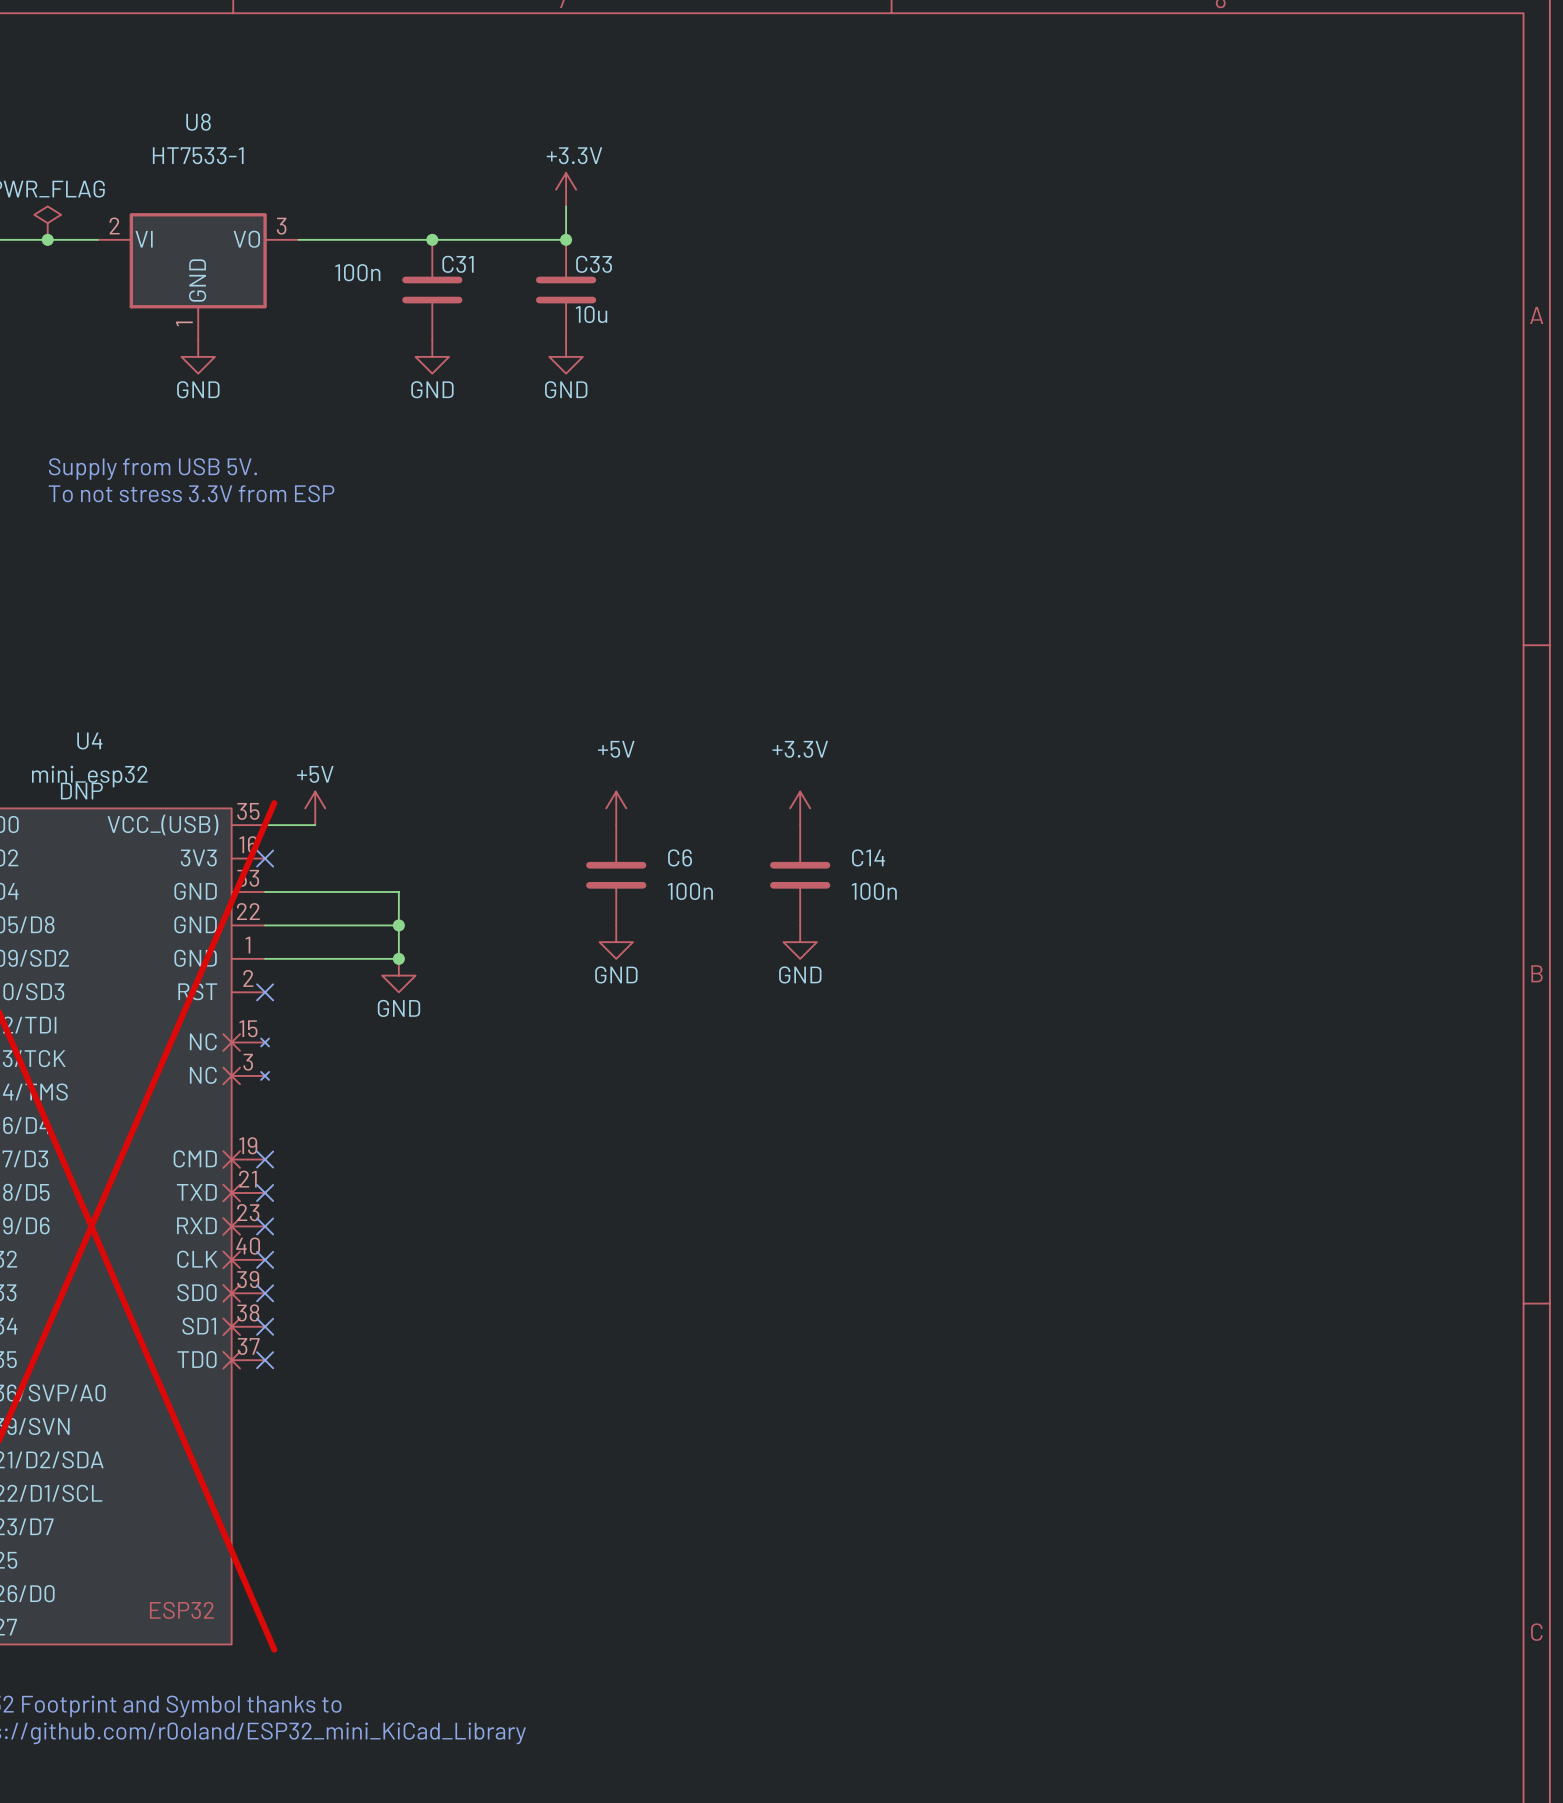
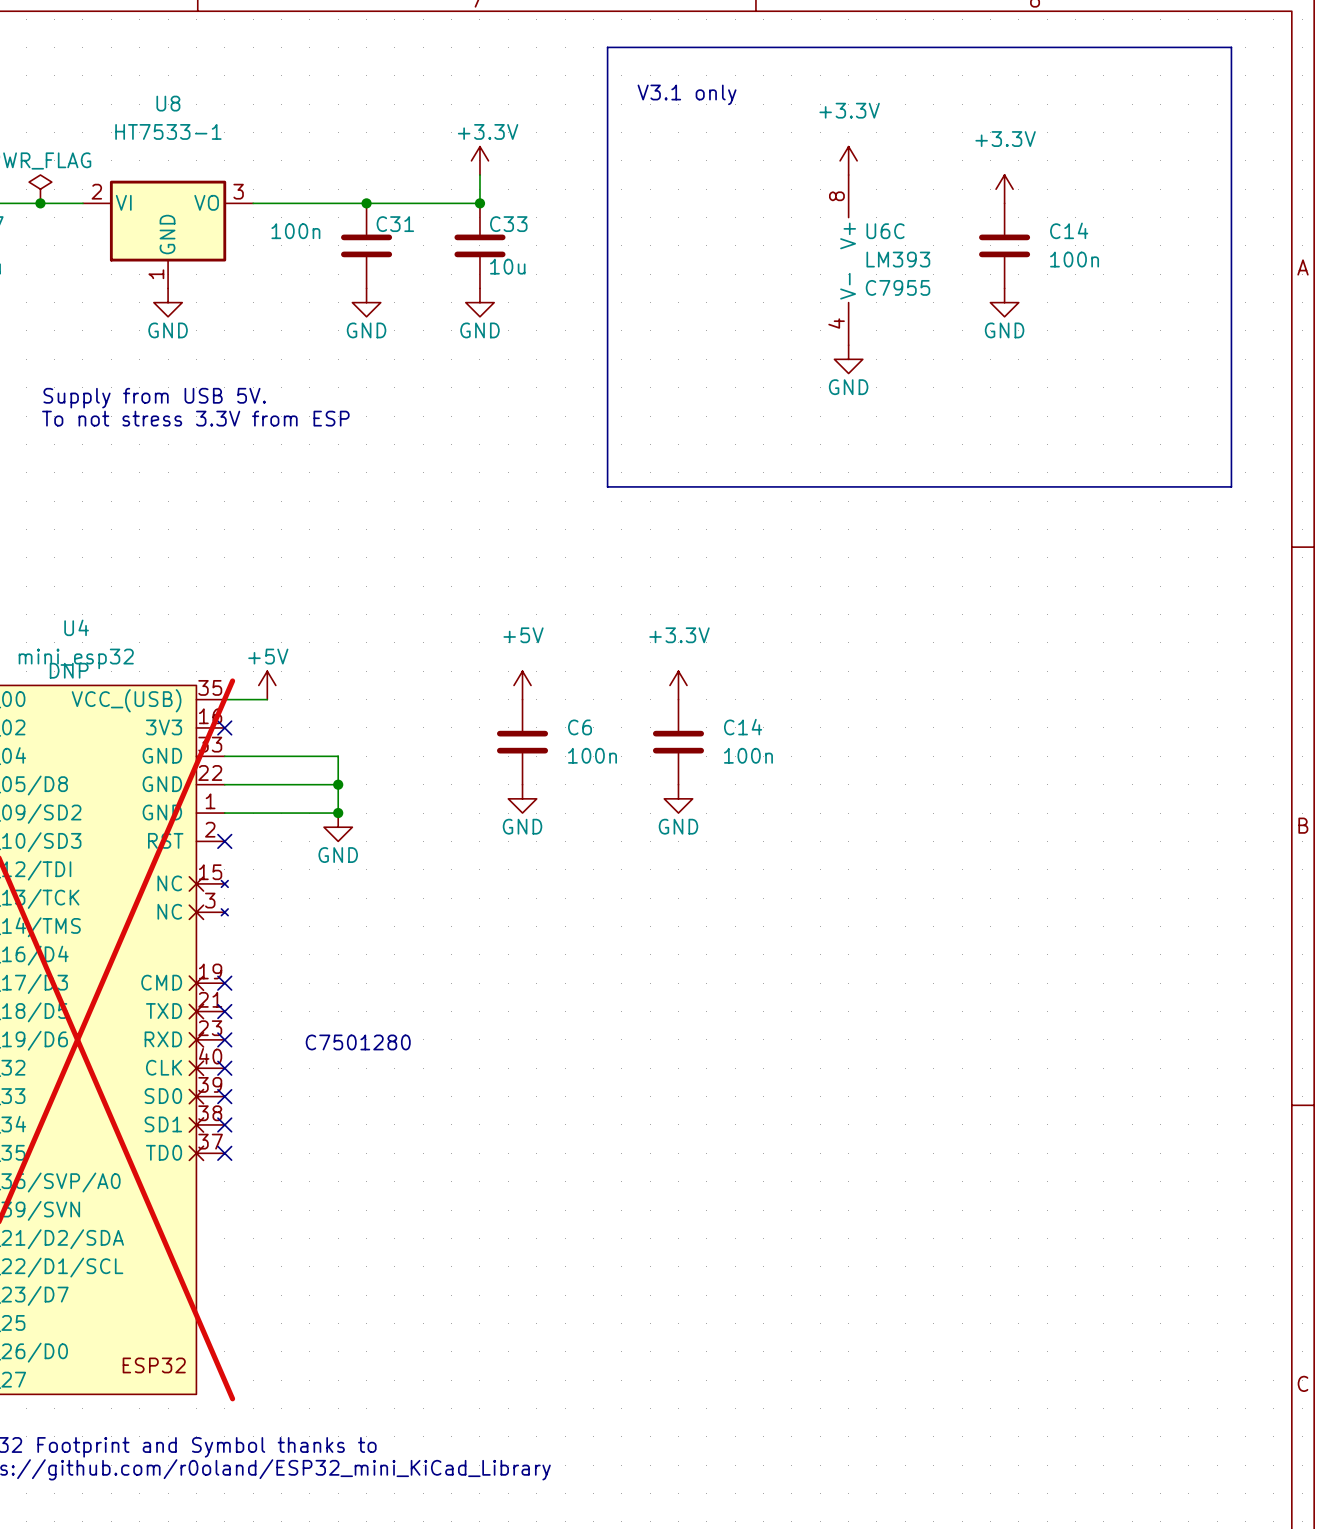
line: none -> (607, 47) (1231, 47) (1231, 486) (607, 486) (607, 47)
text: none -> V3.1 only (687, 94)
power symbol: none -> +3.3V (848, 160)
power symbol: none -> +3.3V (1004, 189)
C14: none -> 100n (1004, 245)
U6C: none -> LM393 (848, 260)
power symbol: none -> GND (1004, 302)
power symbol: none -> GND (848, 359)
text: none -> C7501280 (358, 1042)

